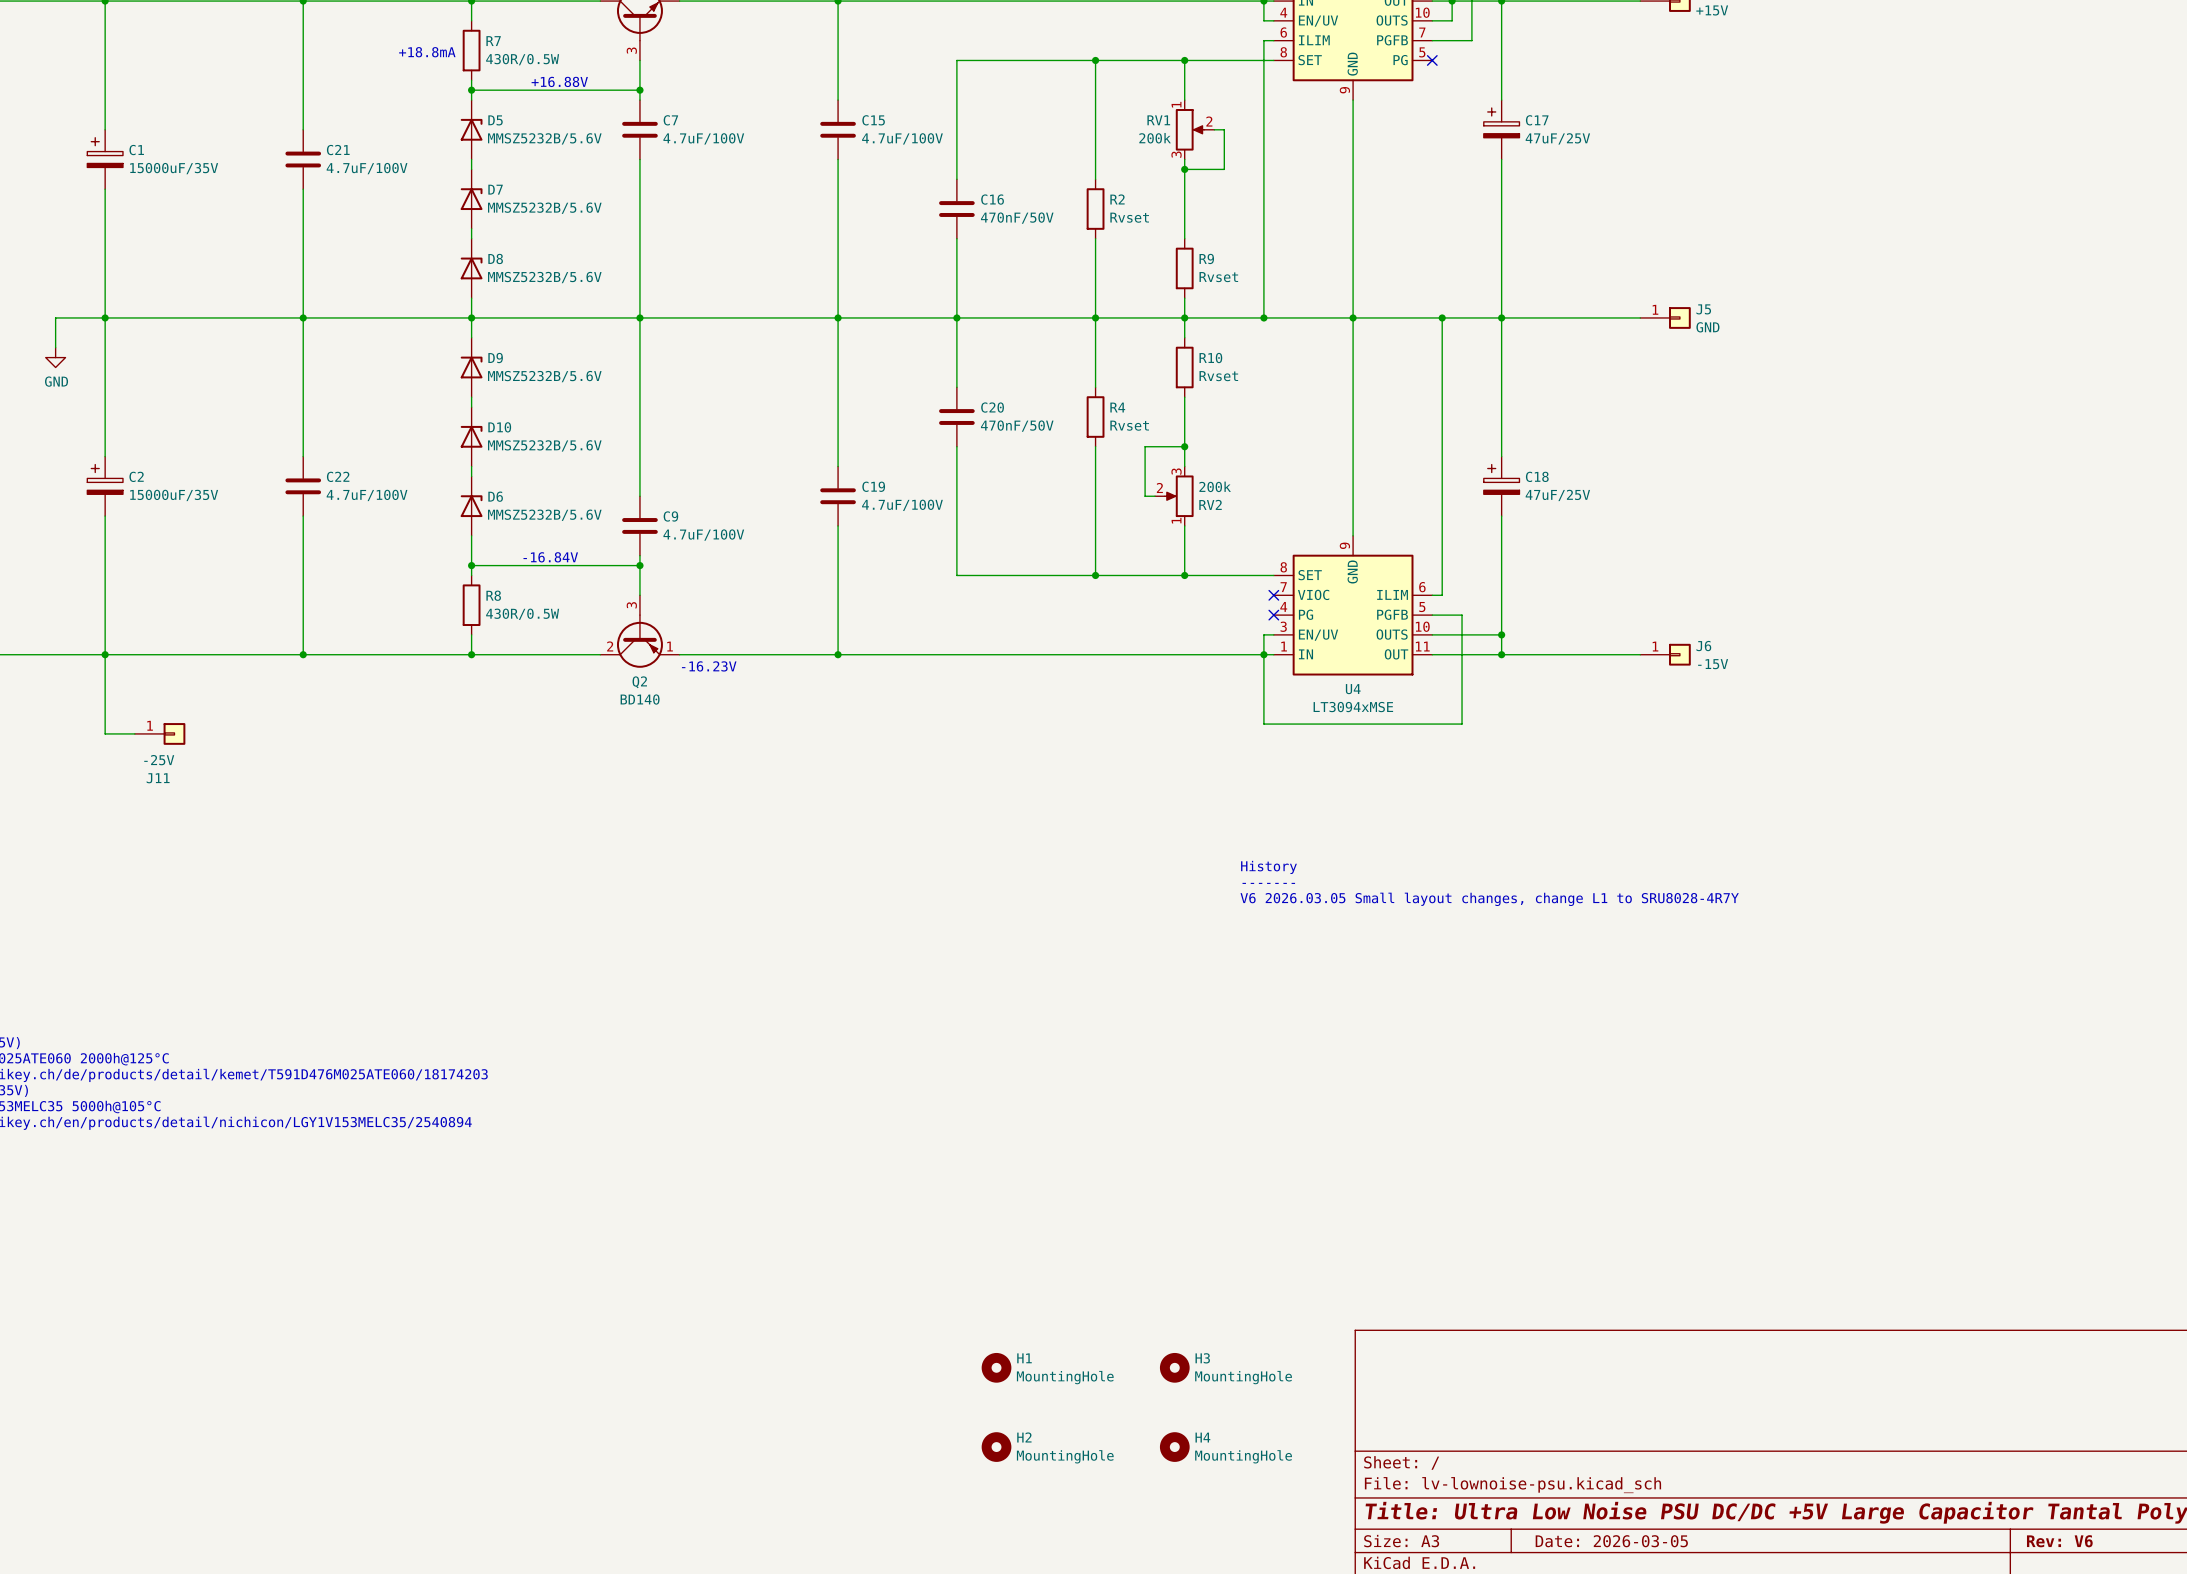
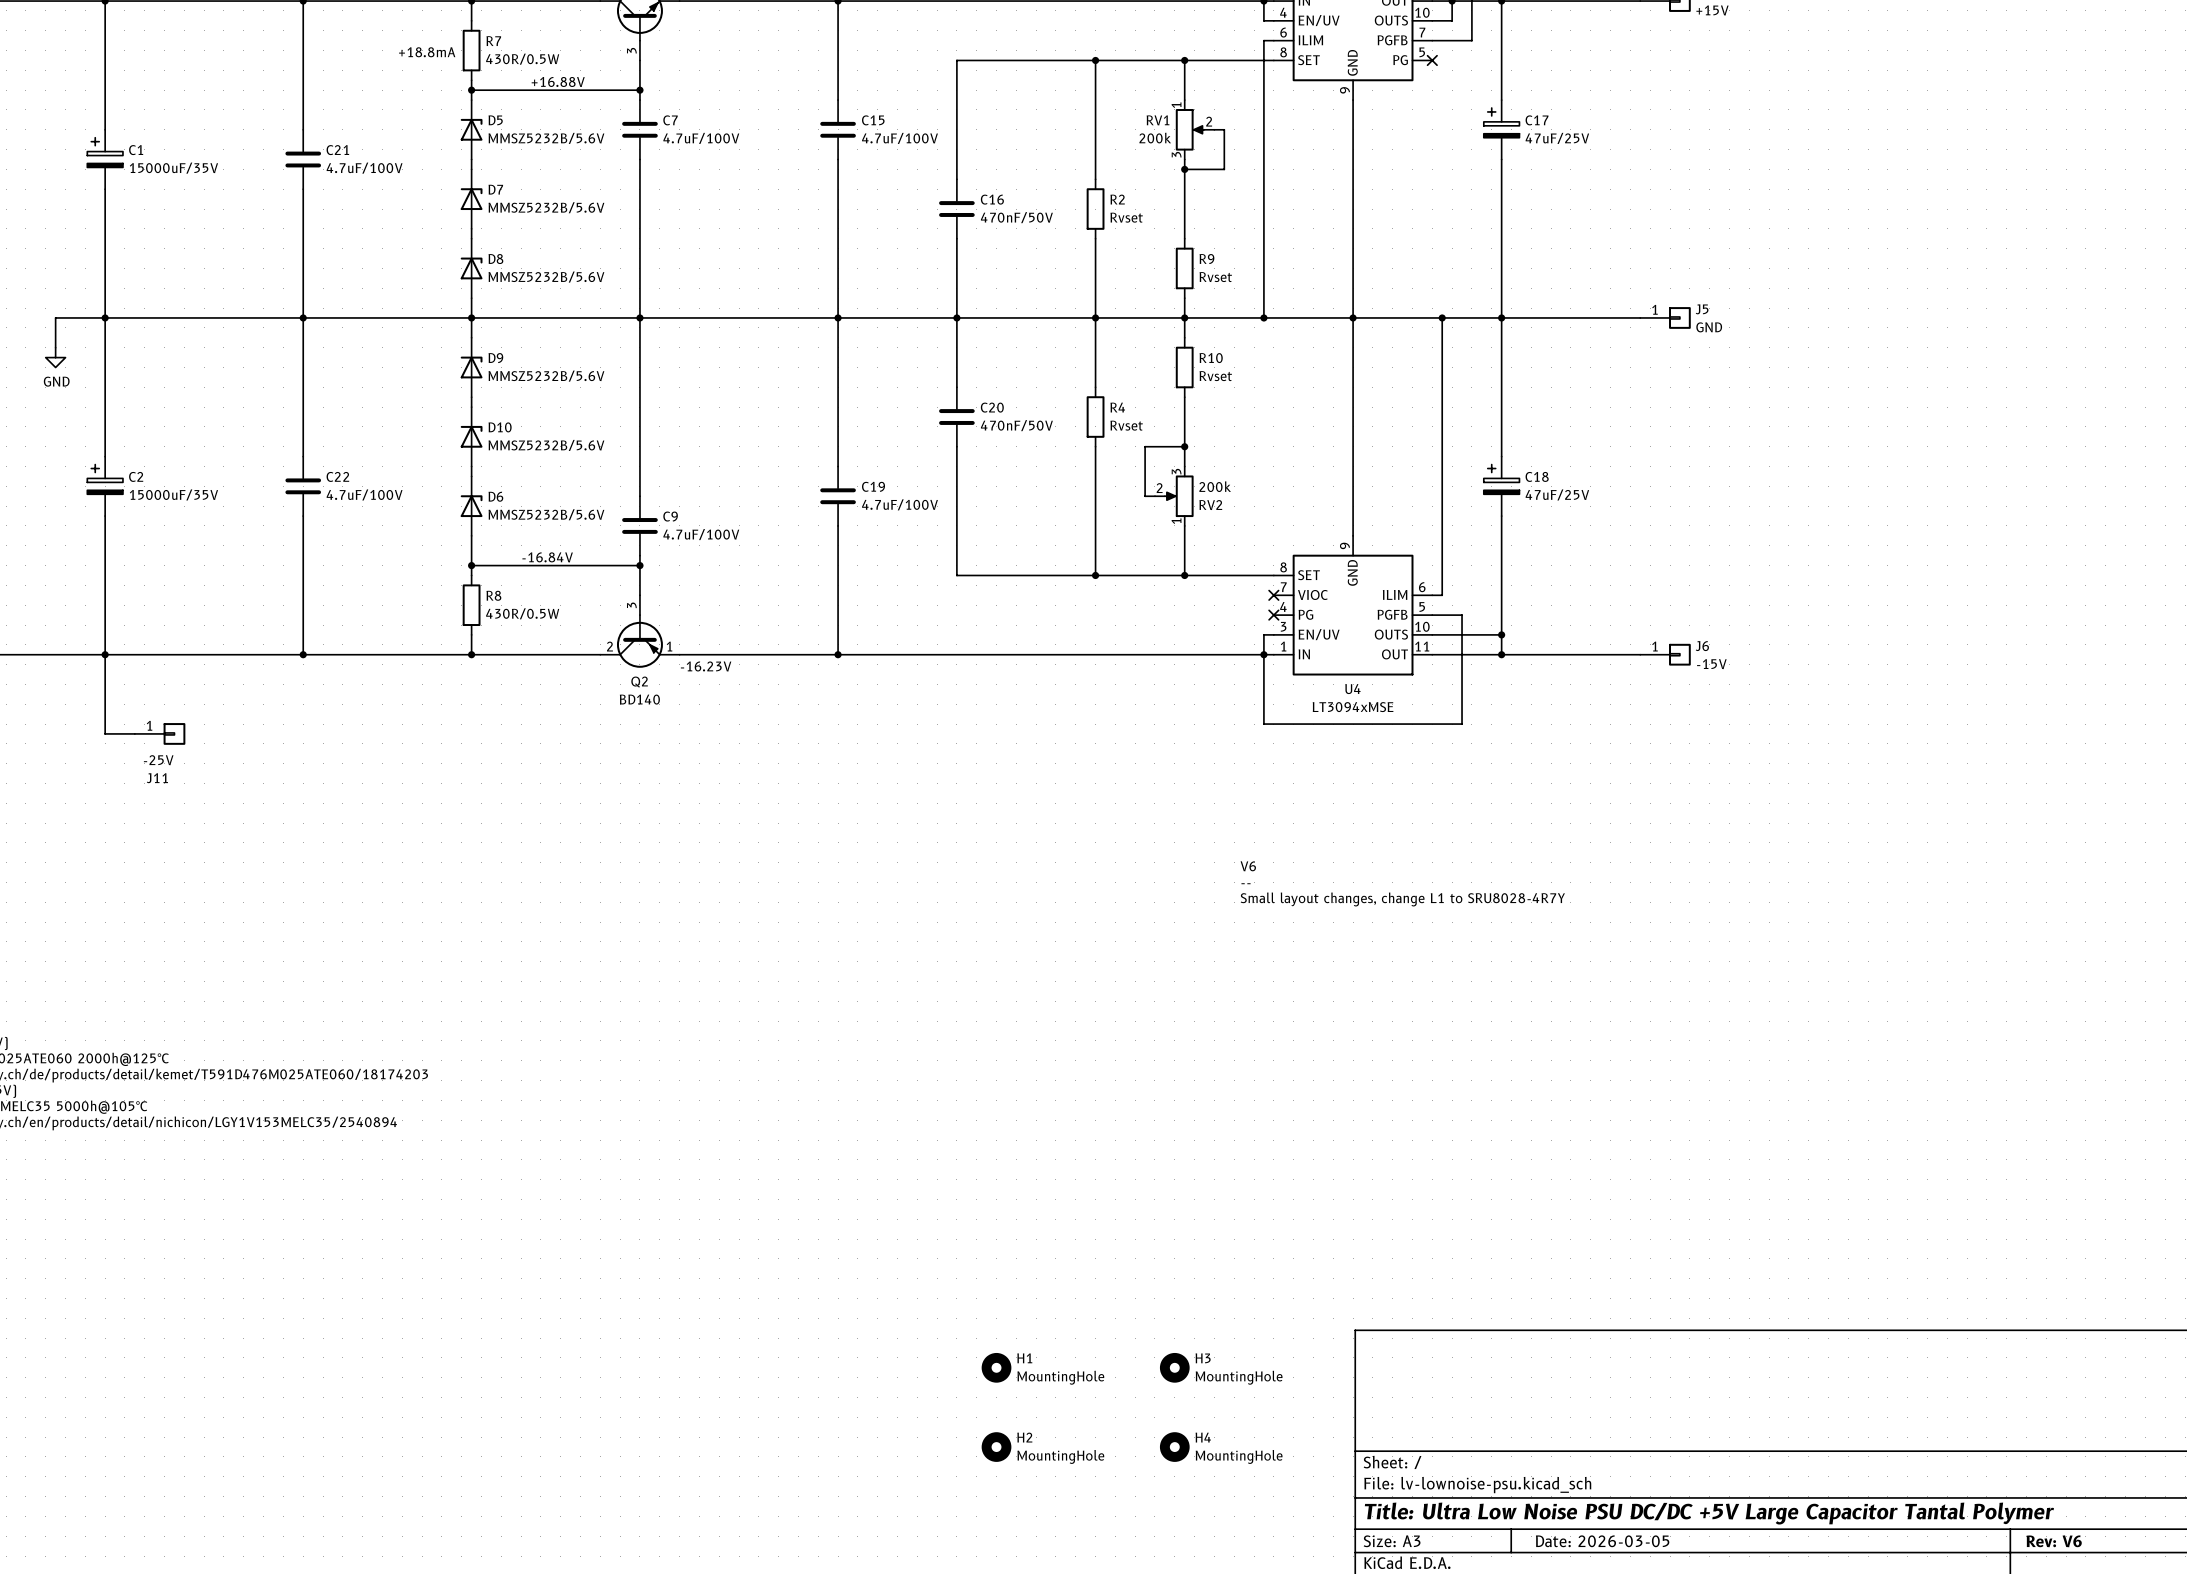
text: History (1268, 867) -> V6 (1248, 866)
text: ------- (1268, 883) -> -- (1246, 883)
text: V6 2026.03.05 Small layout changes, change L1 to SRU8028-4R7Y (1489, 899) -> Small layout changes, change L1 to SRU8028-4R7Y (1402, 899)

